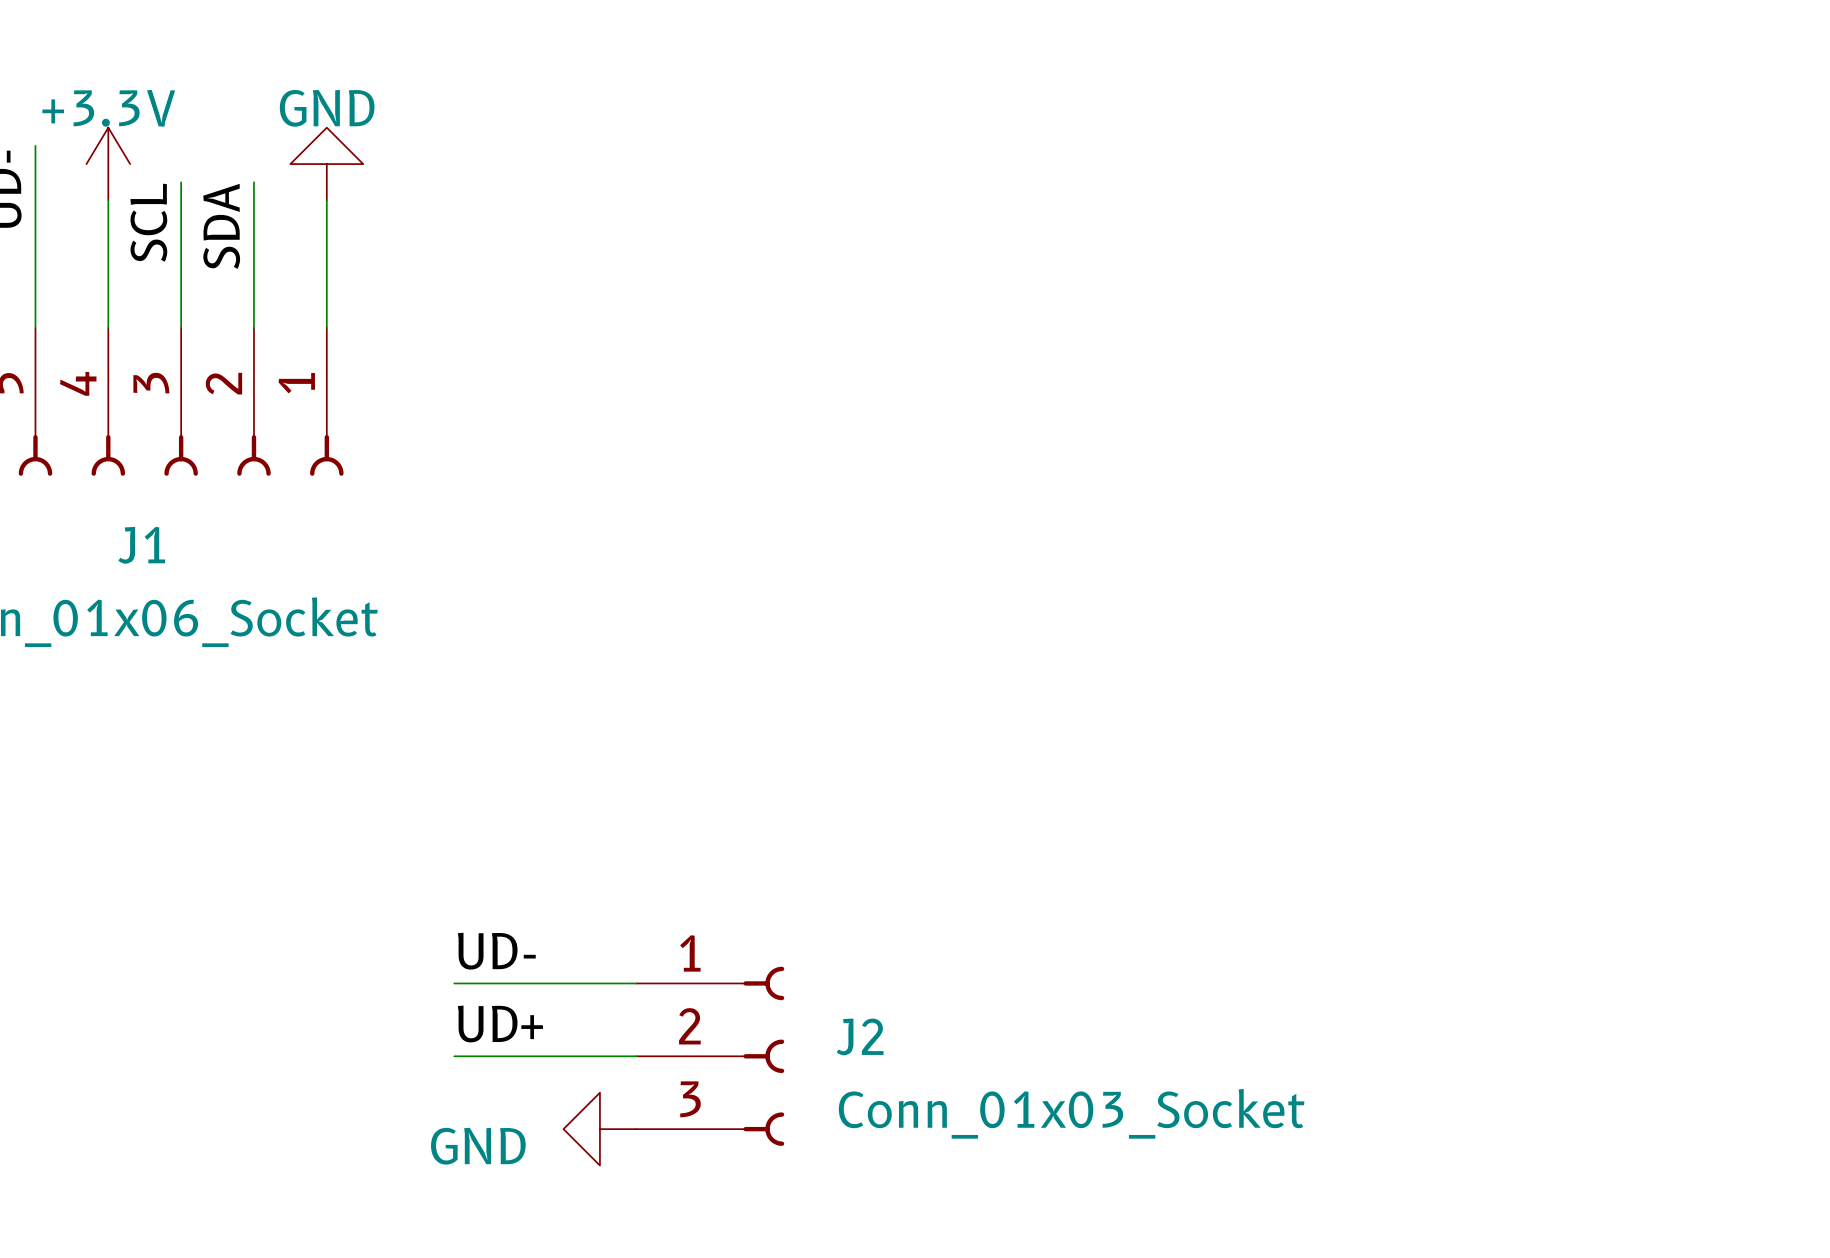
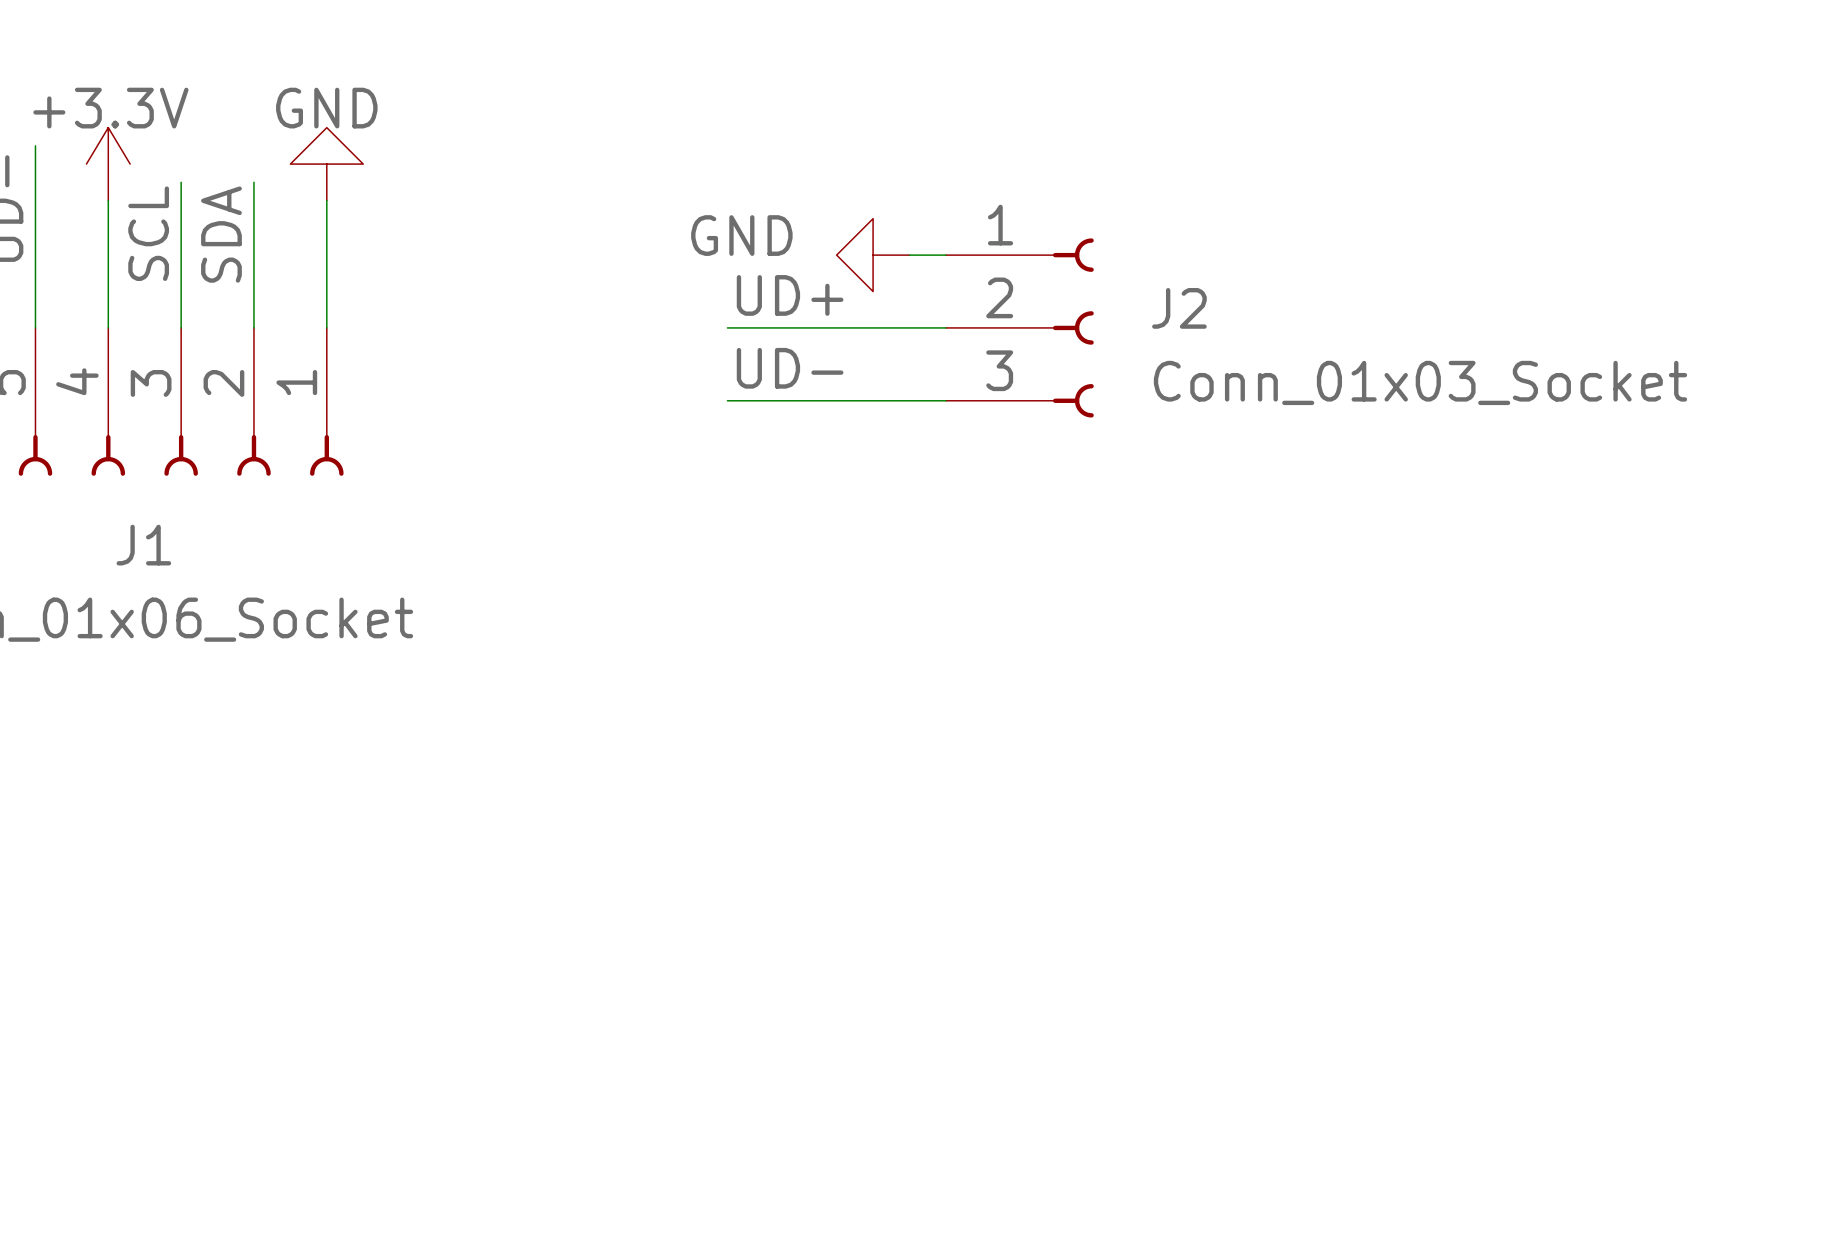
power symbol: none -> GND (873, 255)
wire: none -> (909, 255) (945, 255)
label: none -> UD+ (790, 295)
wire: none -> (727, 327) (945, 327)
wire: none -> (727, 400) (945, 400)
label position: UD- (496, 951) -> UD- (790, 368)
wire: (454, 983) (636, 983) -> none
label: UD+ (500, 1024) -> none
wire: (454, 1056) (636, 1056) -> none
J2 position: (710, 1056) -> (1019, 327)
power symbol: GND (599, 1129) -> none

